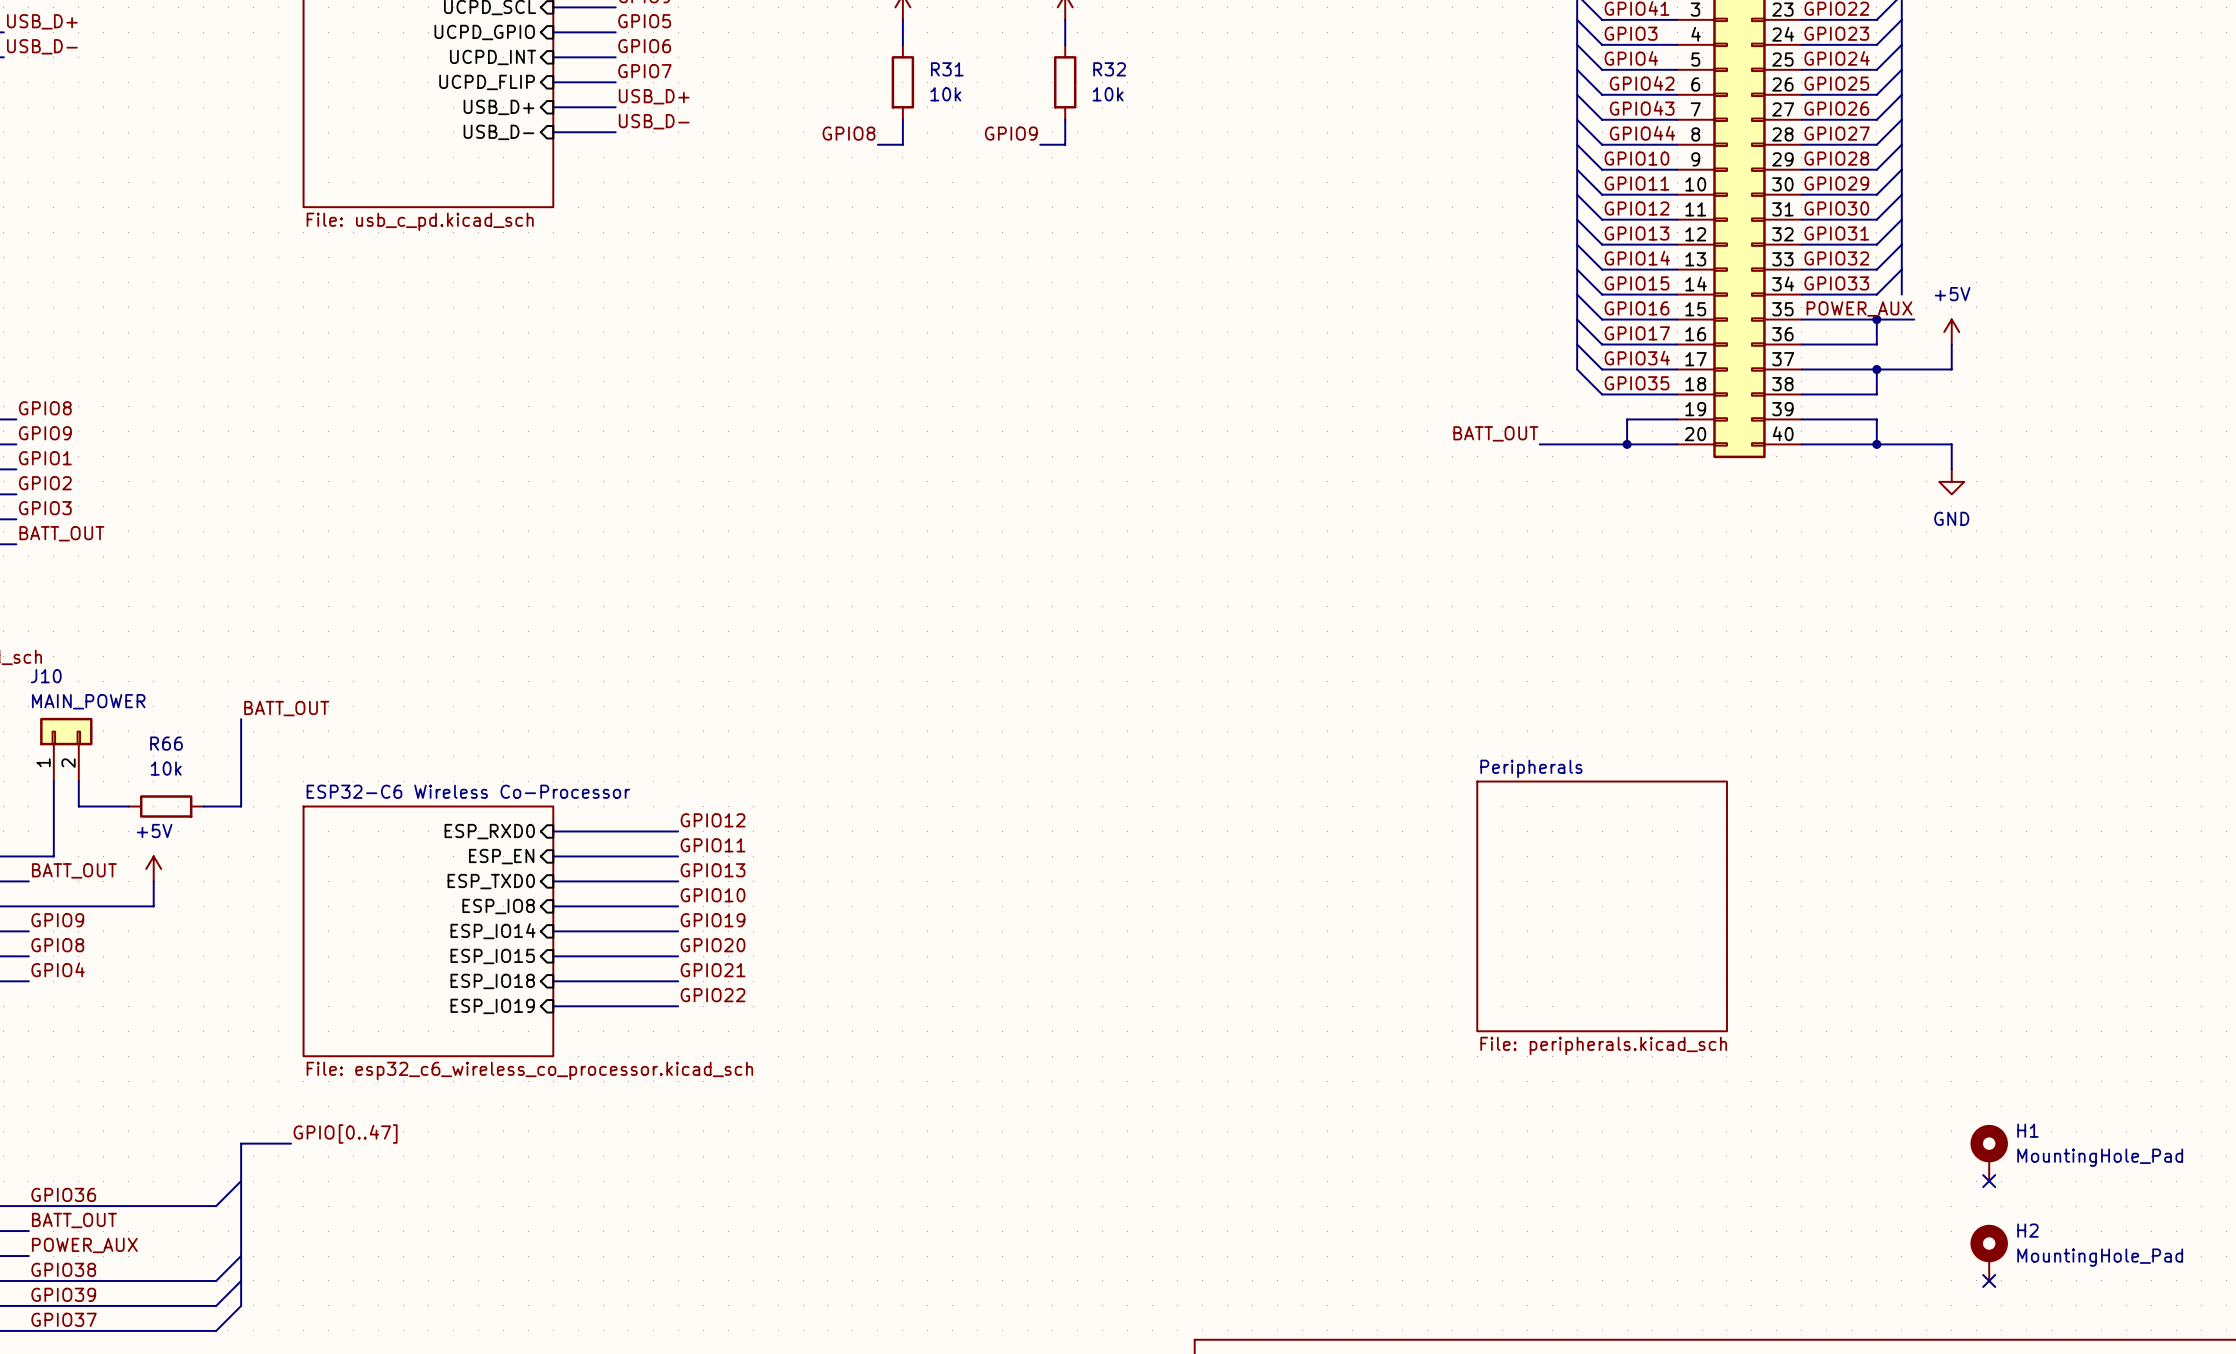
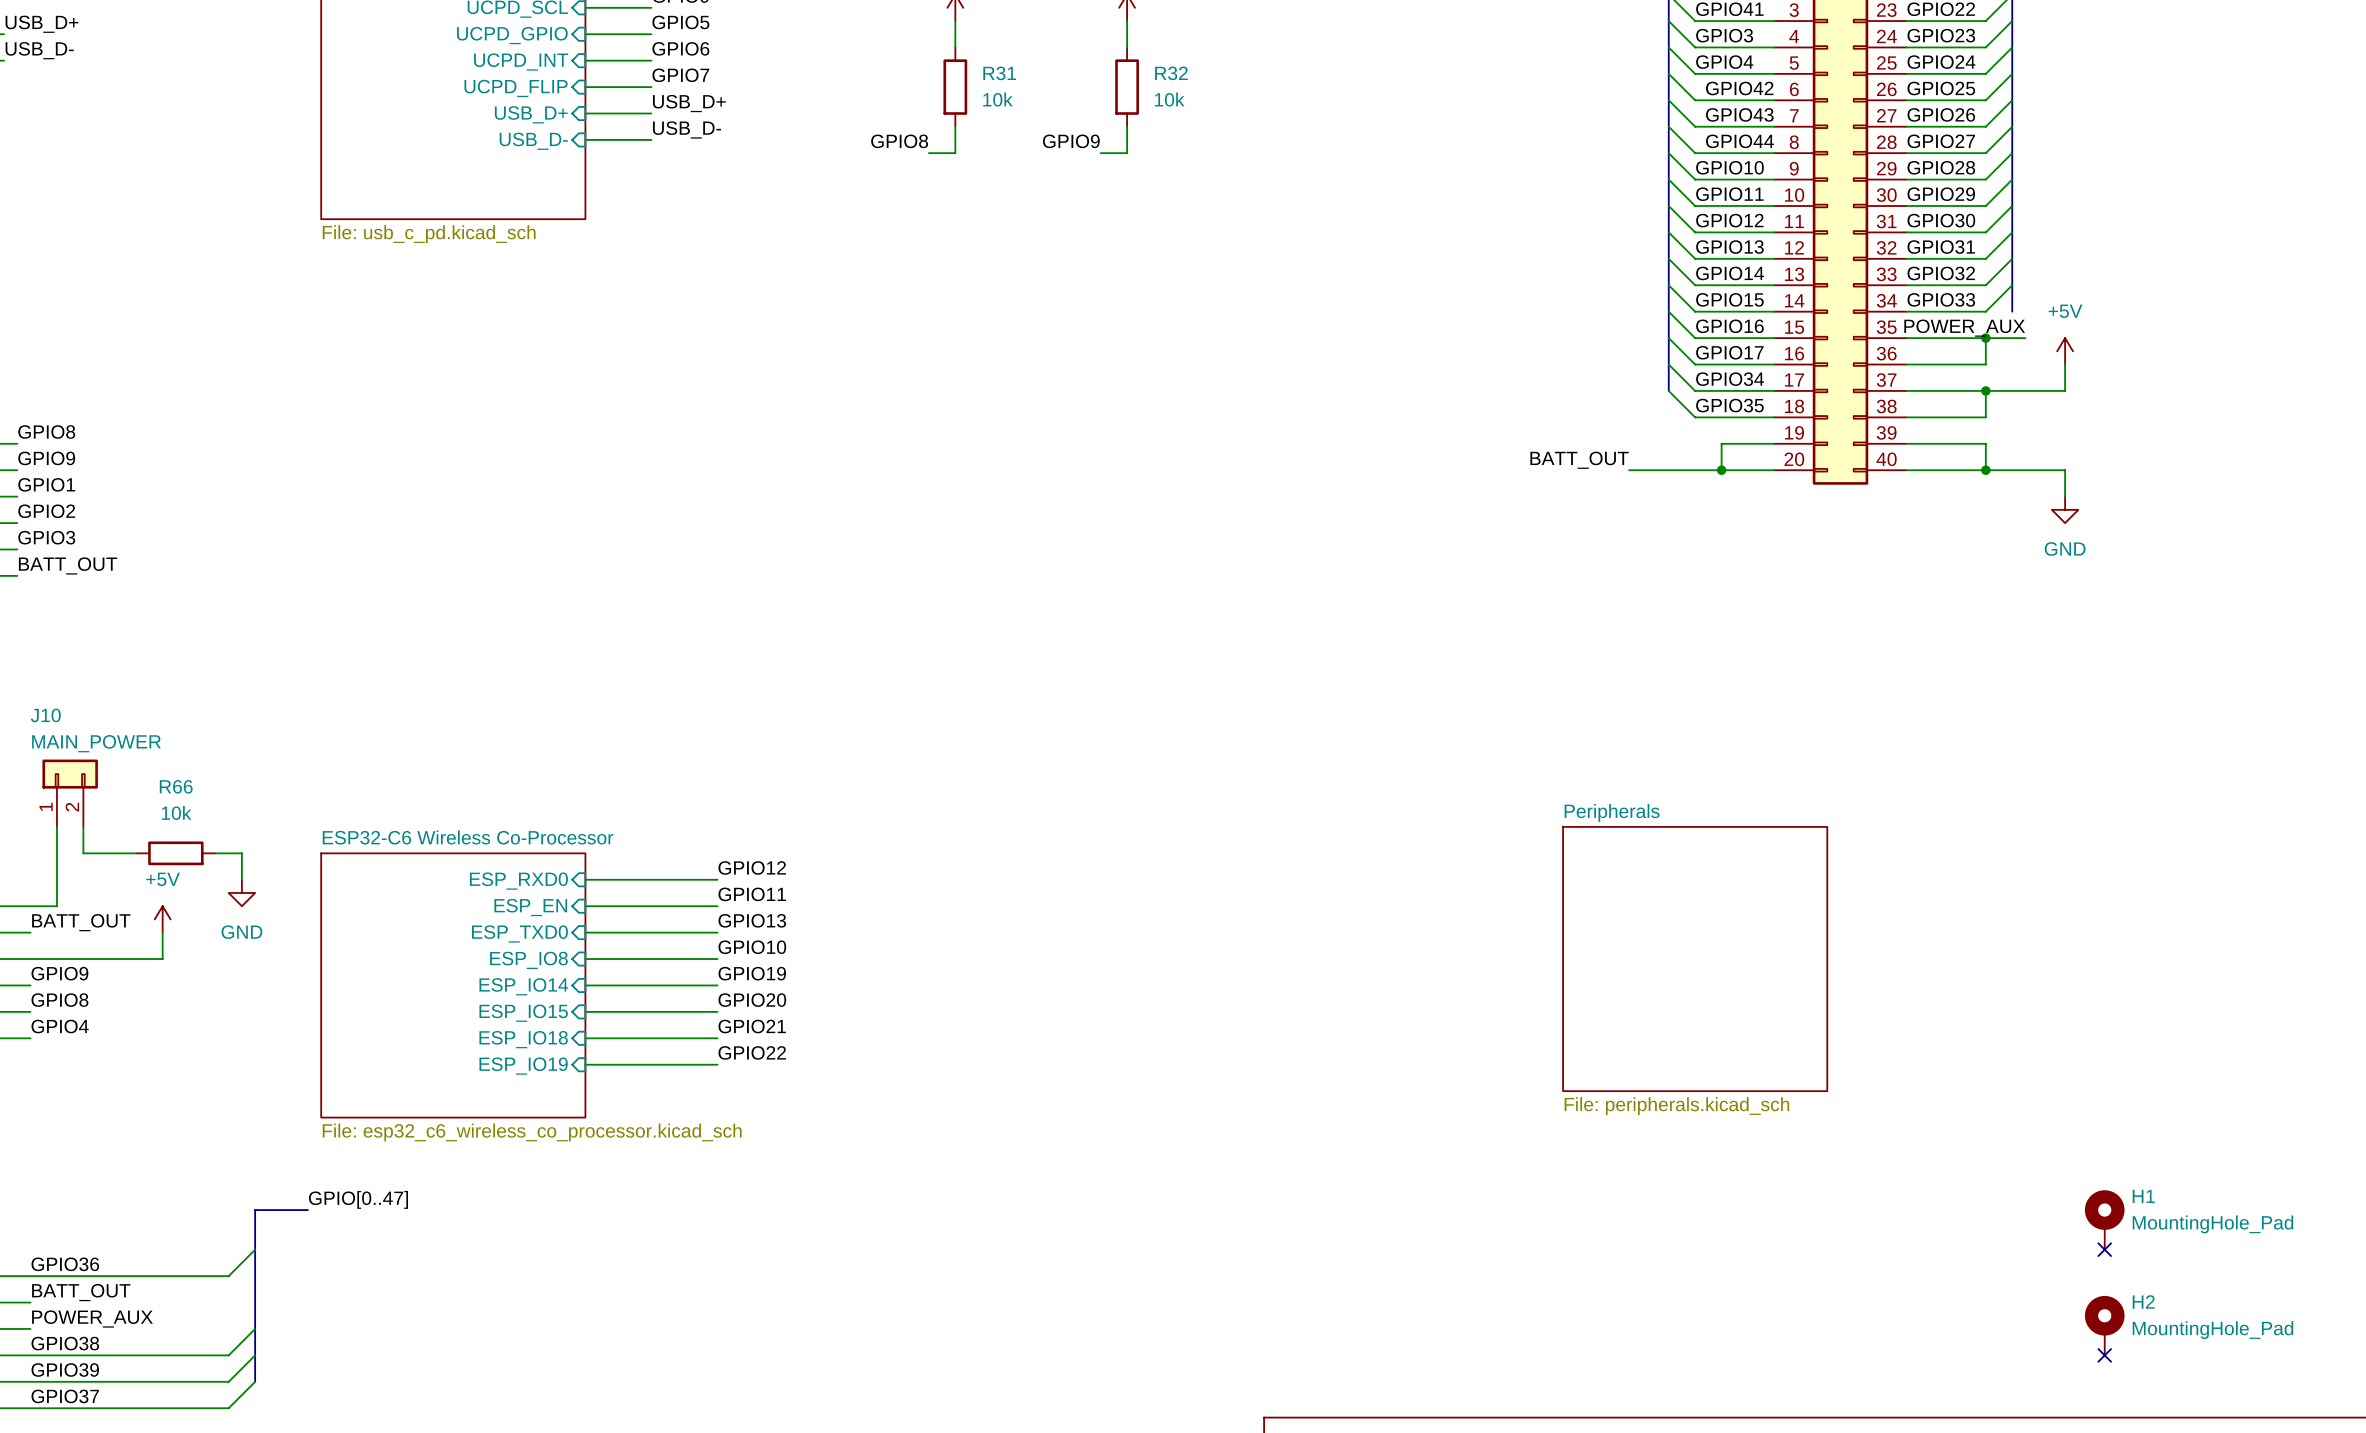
label: BATT_OUT (286, 708) -> none
wire: (241, 719) (241, 806) (228, 806) -> (241, 879) (241, 853)
power symbol: none -> GND (241, 892)

